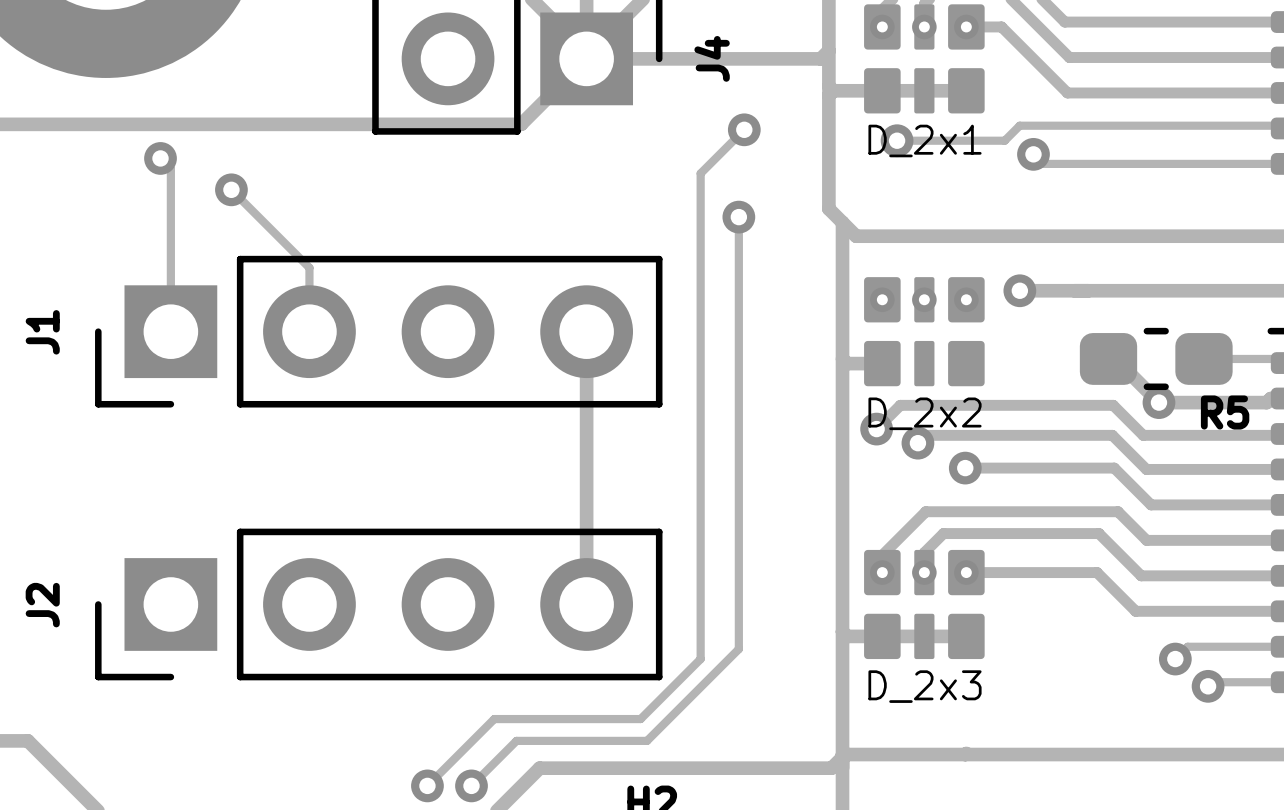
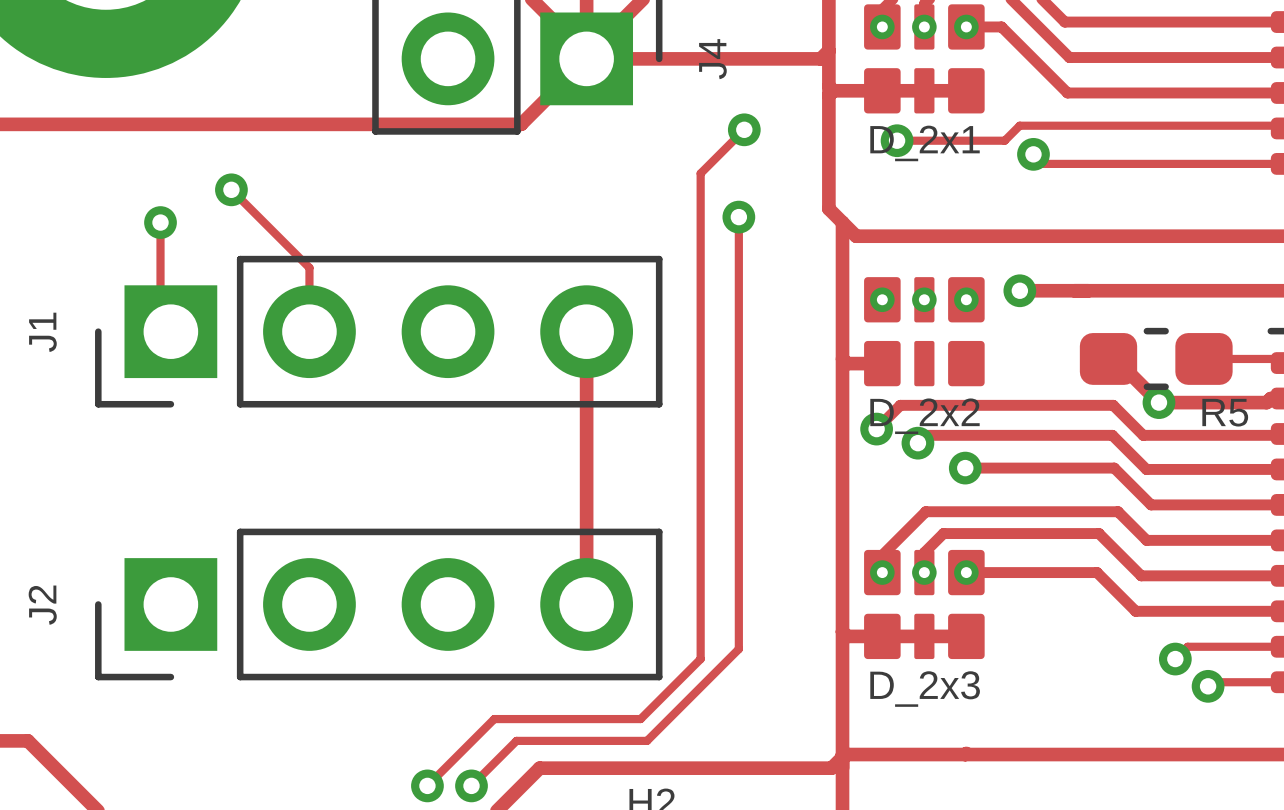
track: (160, 158) (170, 168) (170, 331) -> (160, 222) (160, 321) (170, 331)
via position: (160, 158) -> (160, 222)

